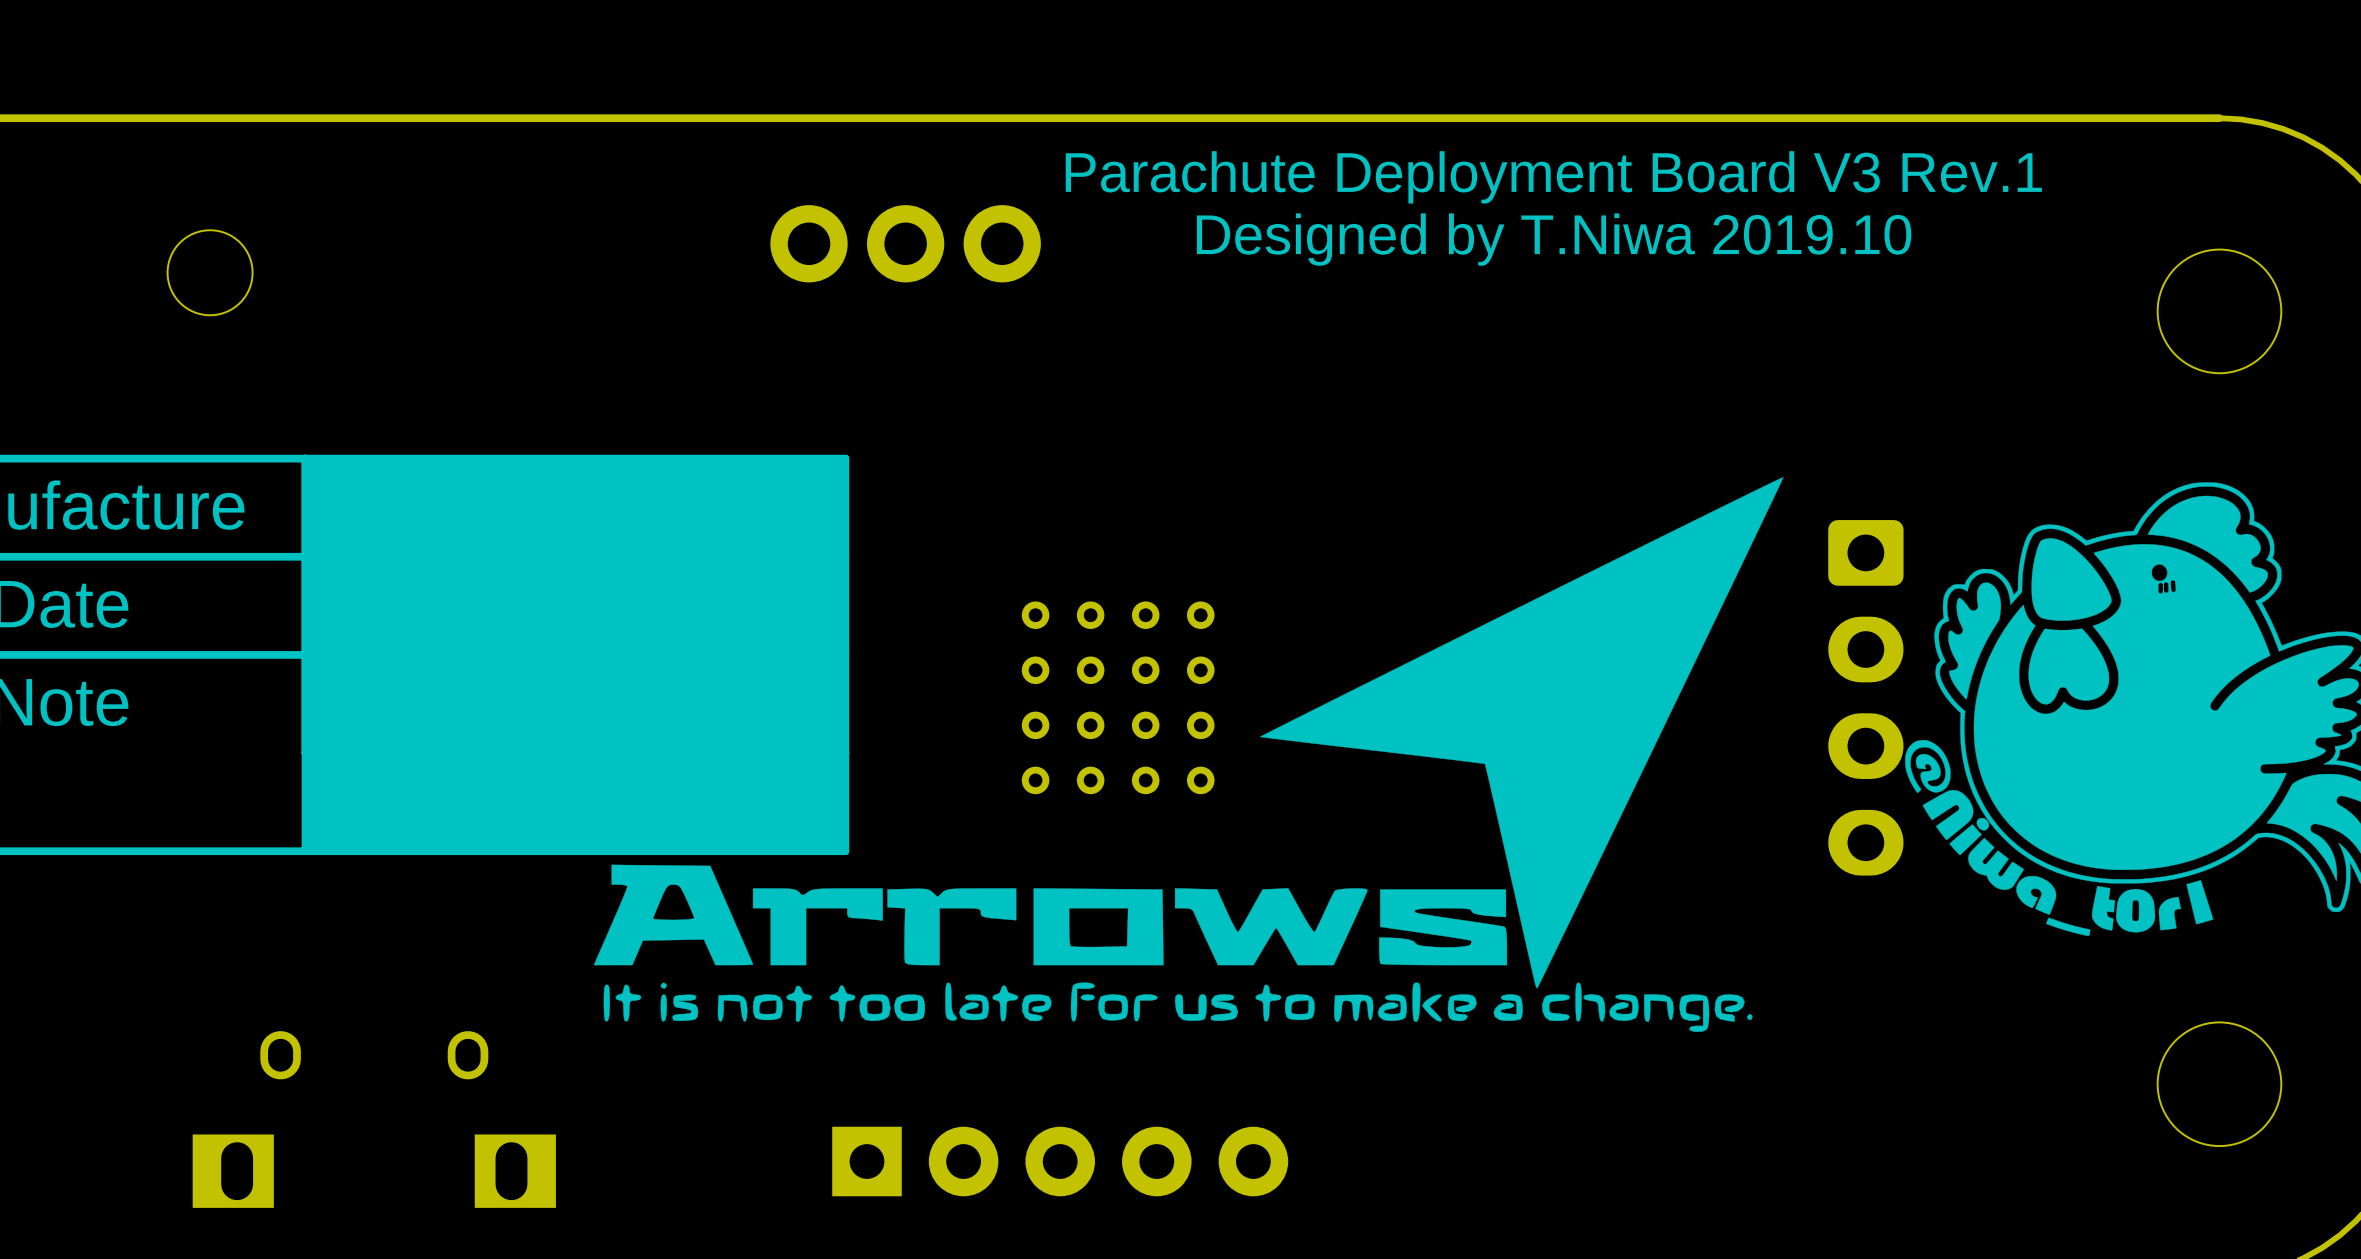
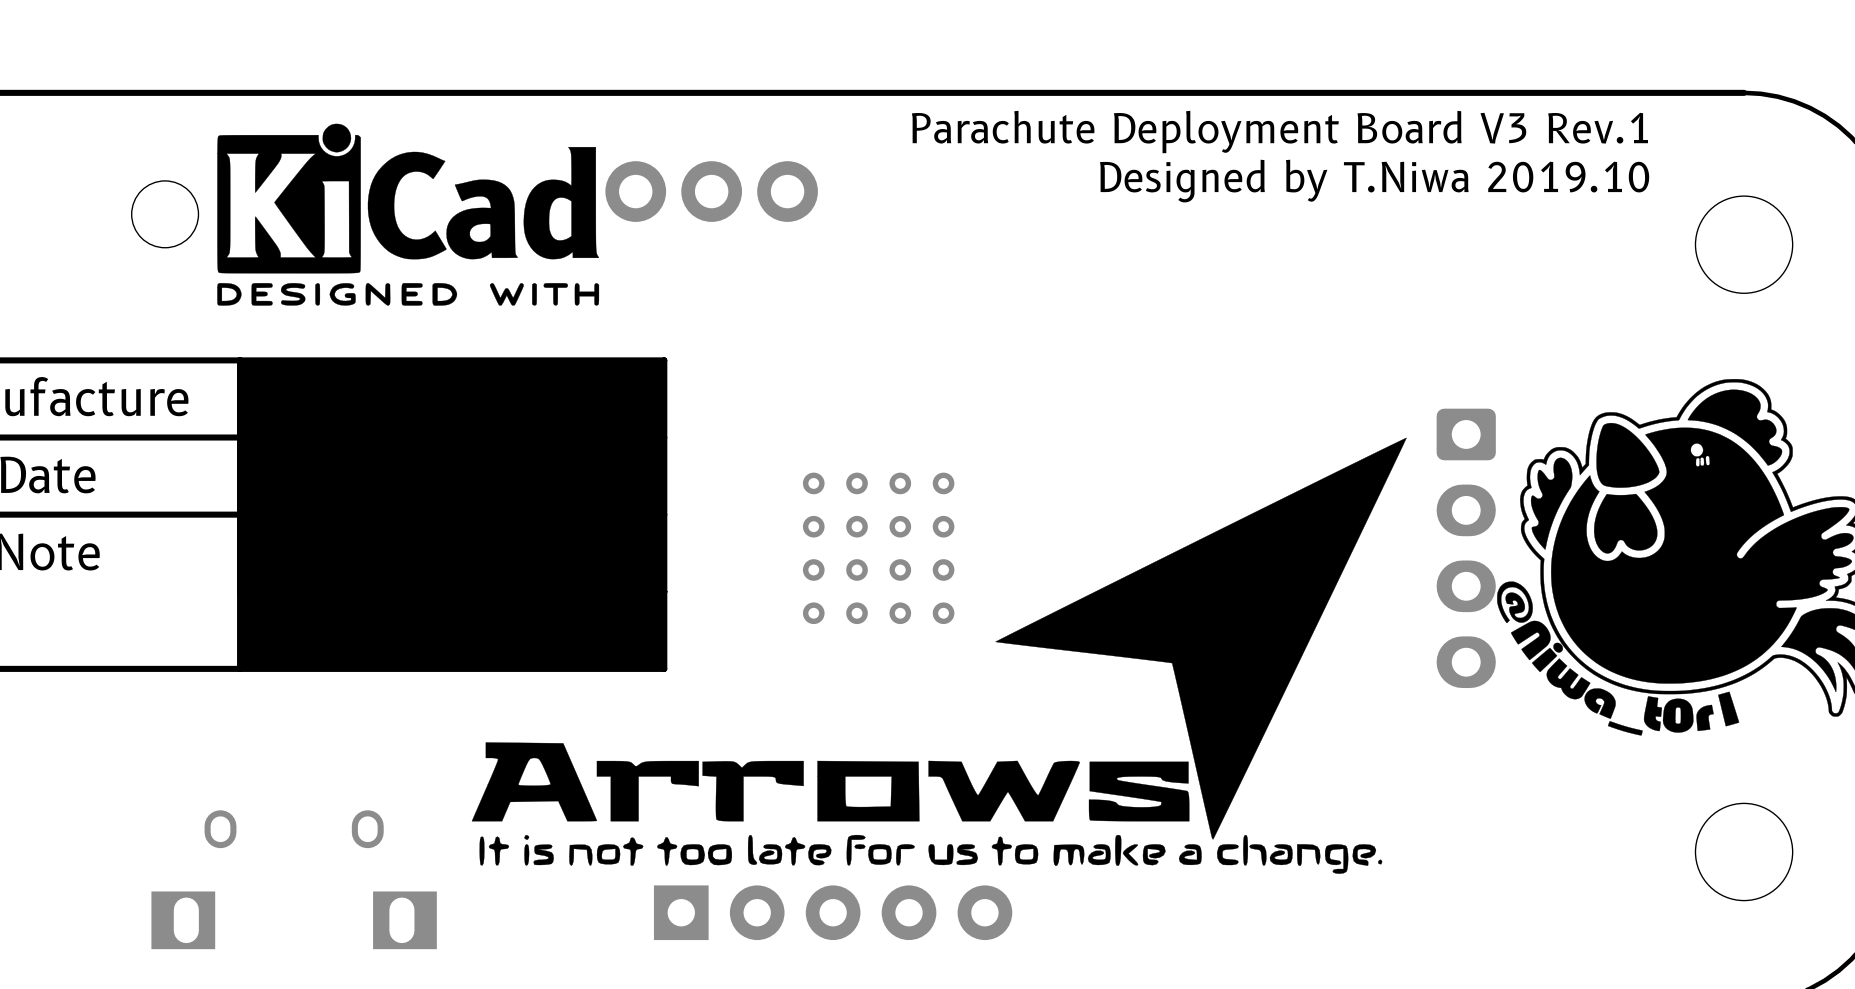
drawing: none -> [217, 123, 600, 306]
text position: Parachute Deployment Board V3 Rev.1 (1553, 177) -> Parachute Deployment Board V3 Rev.1 (1279, 132)
text position: Designed by T.Niwa 2019.10 (1554, 239) -> Designed by T.Niwa 2019.10 (1374, 181)
drawing position: (1188, 754) -> (939, 655)

